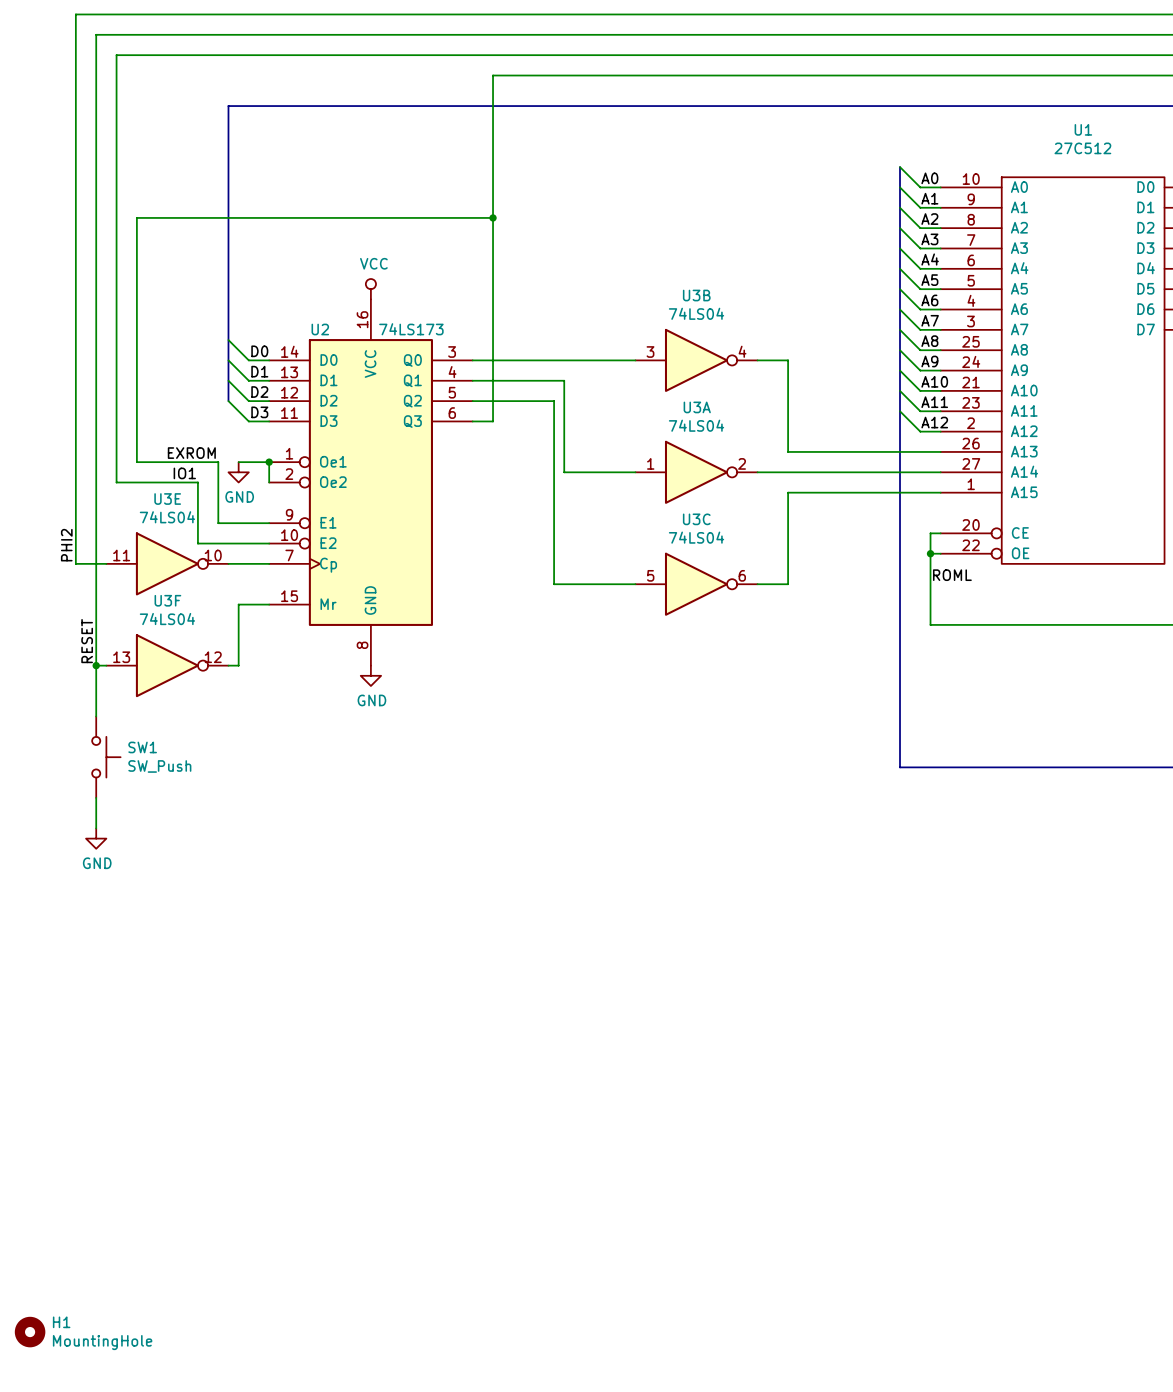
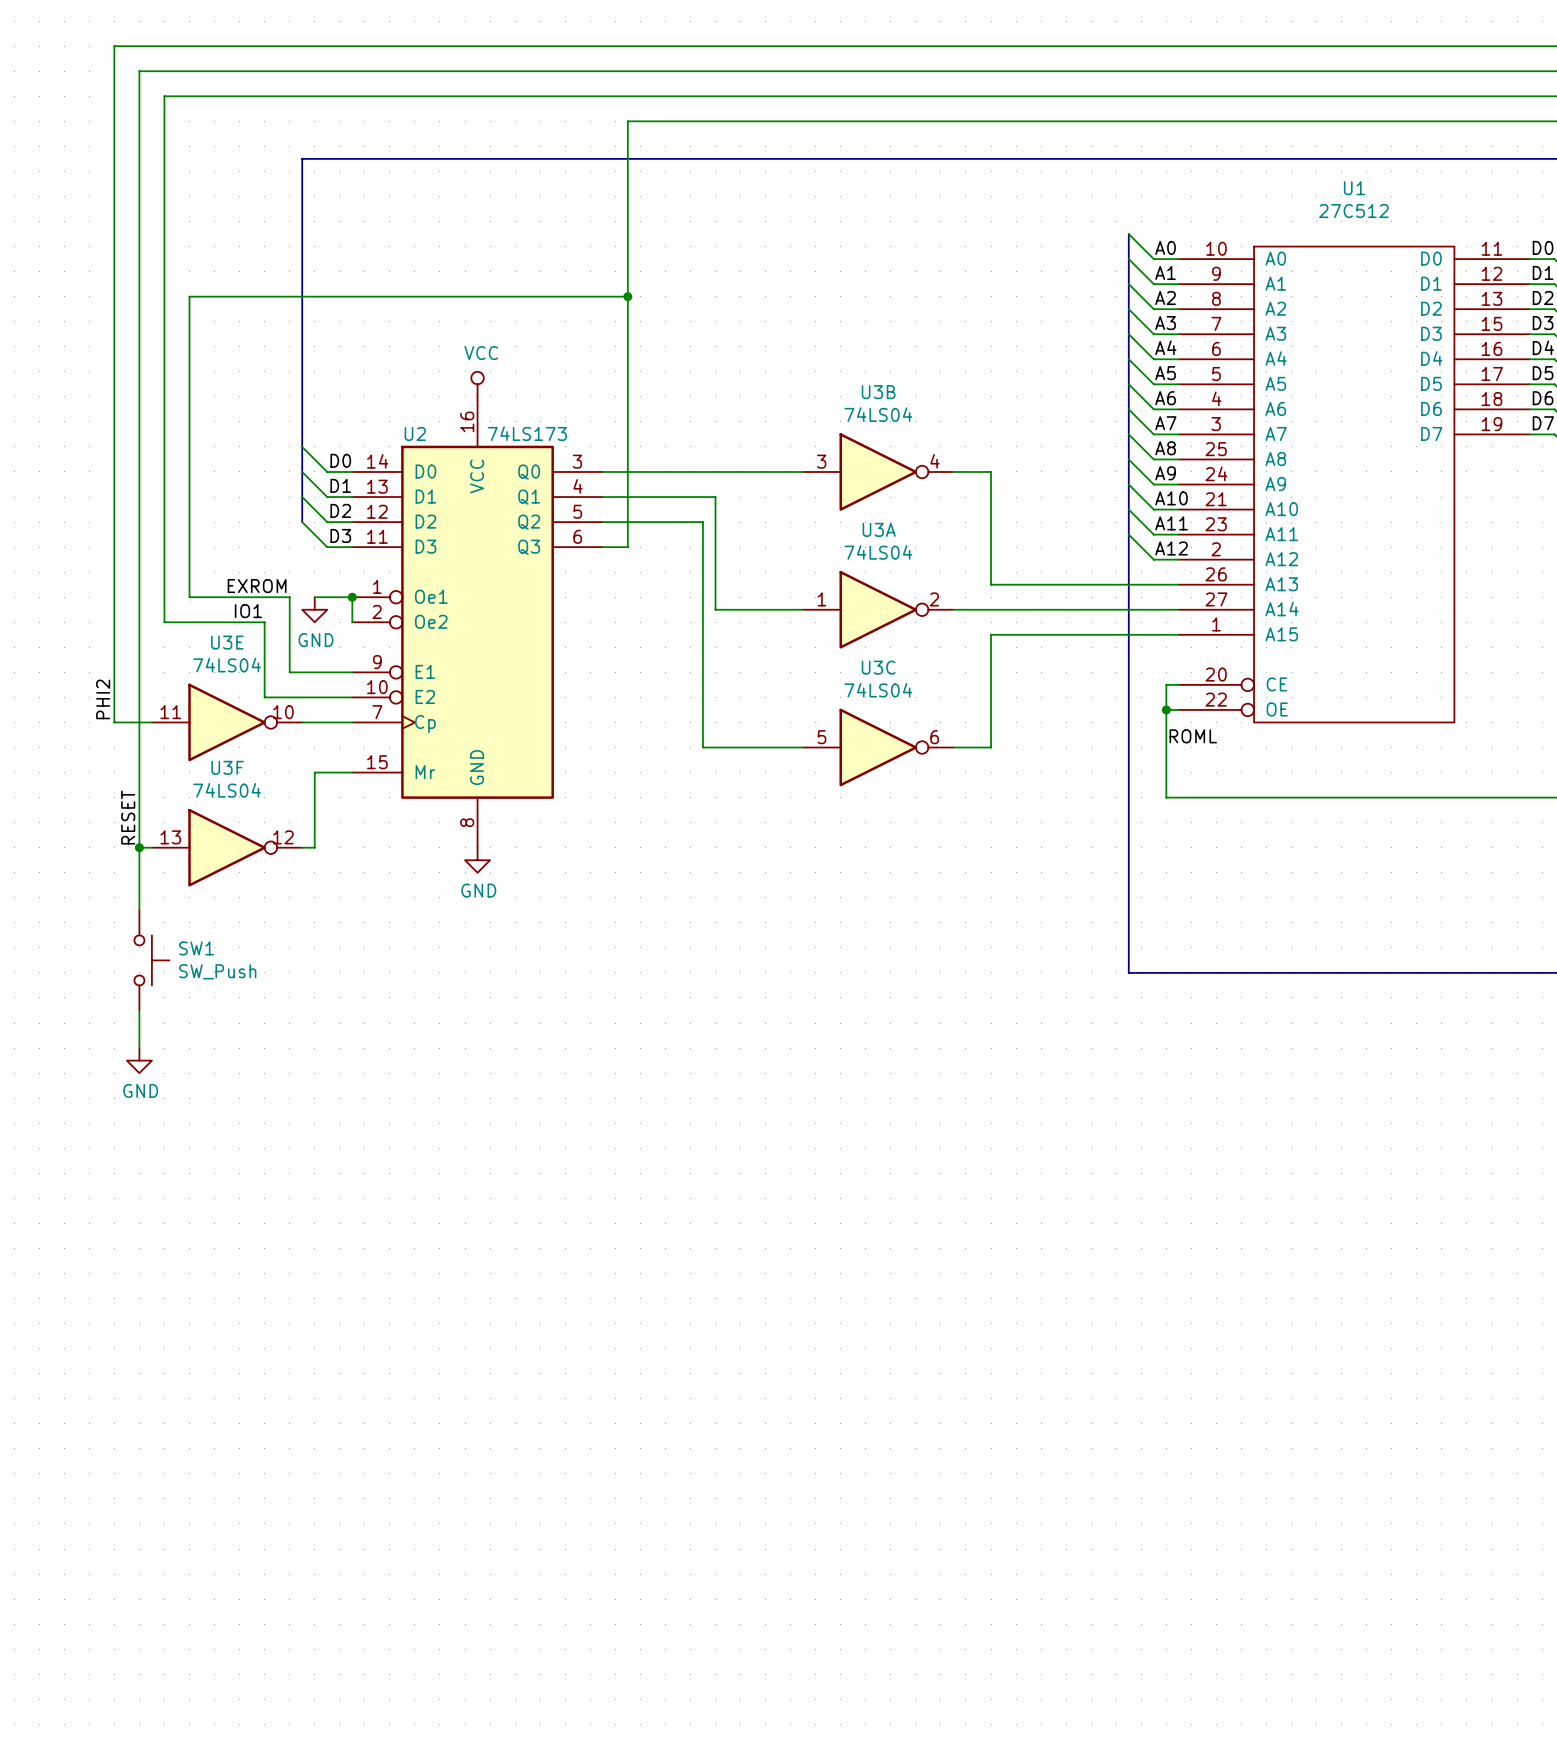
H1: MountingHole (30, 1332) -> none

